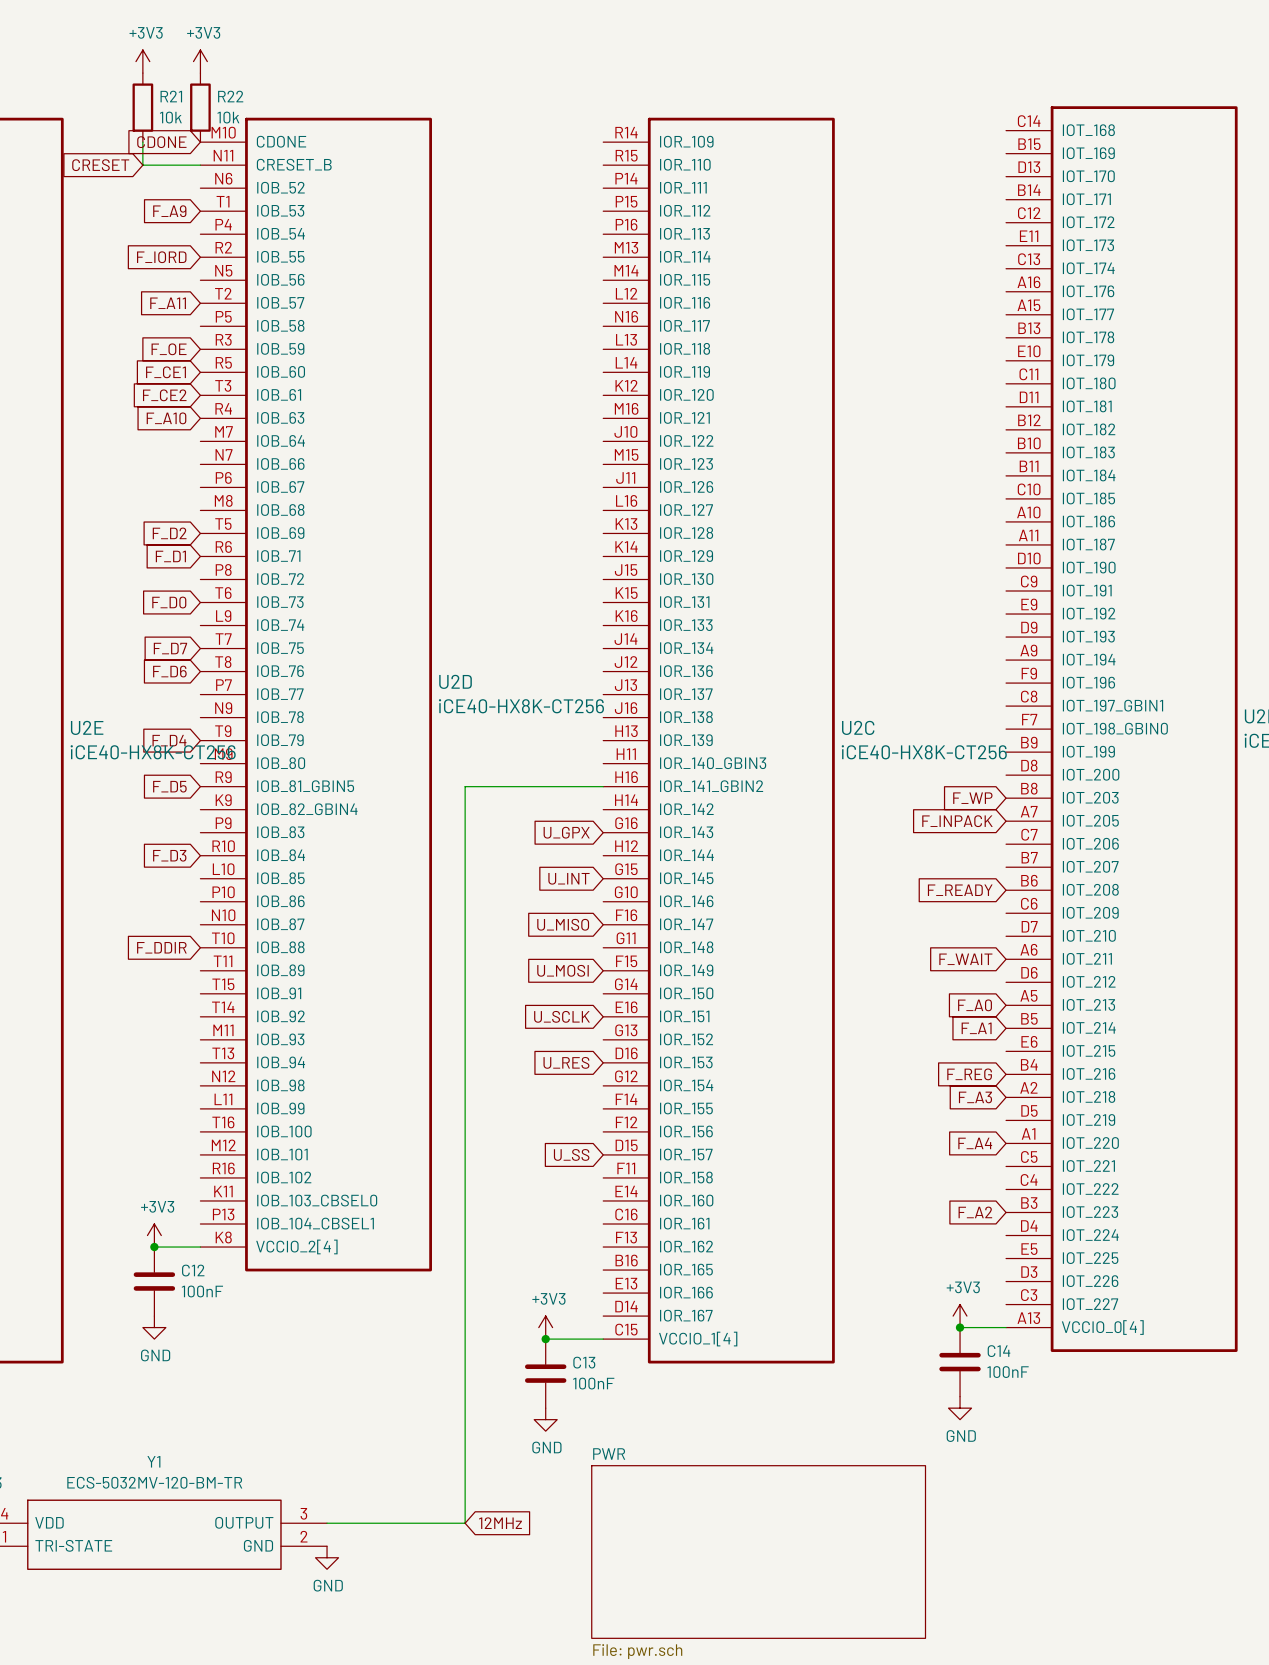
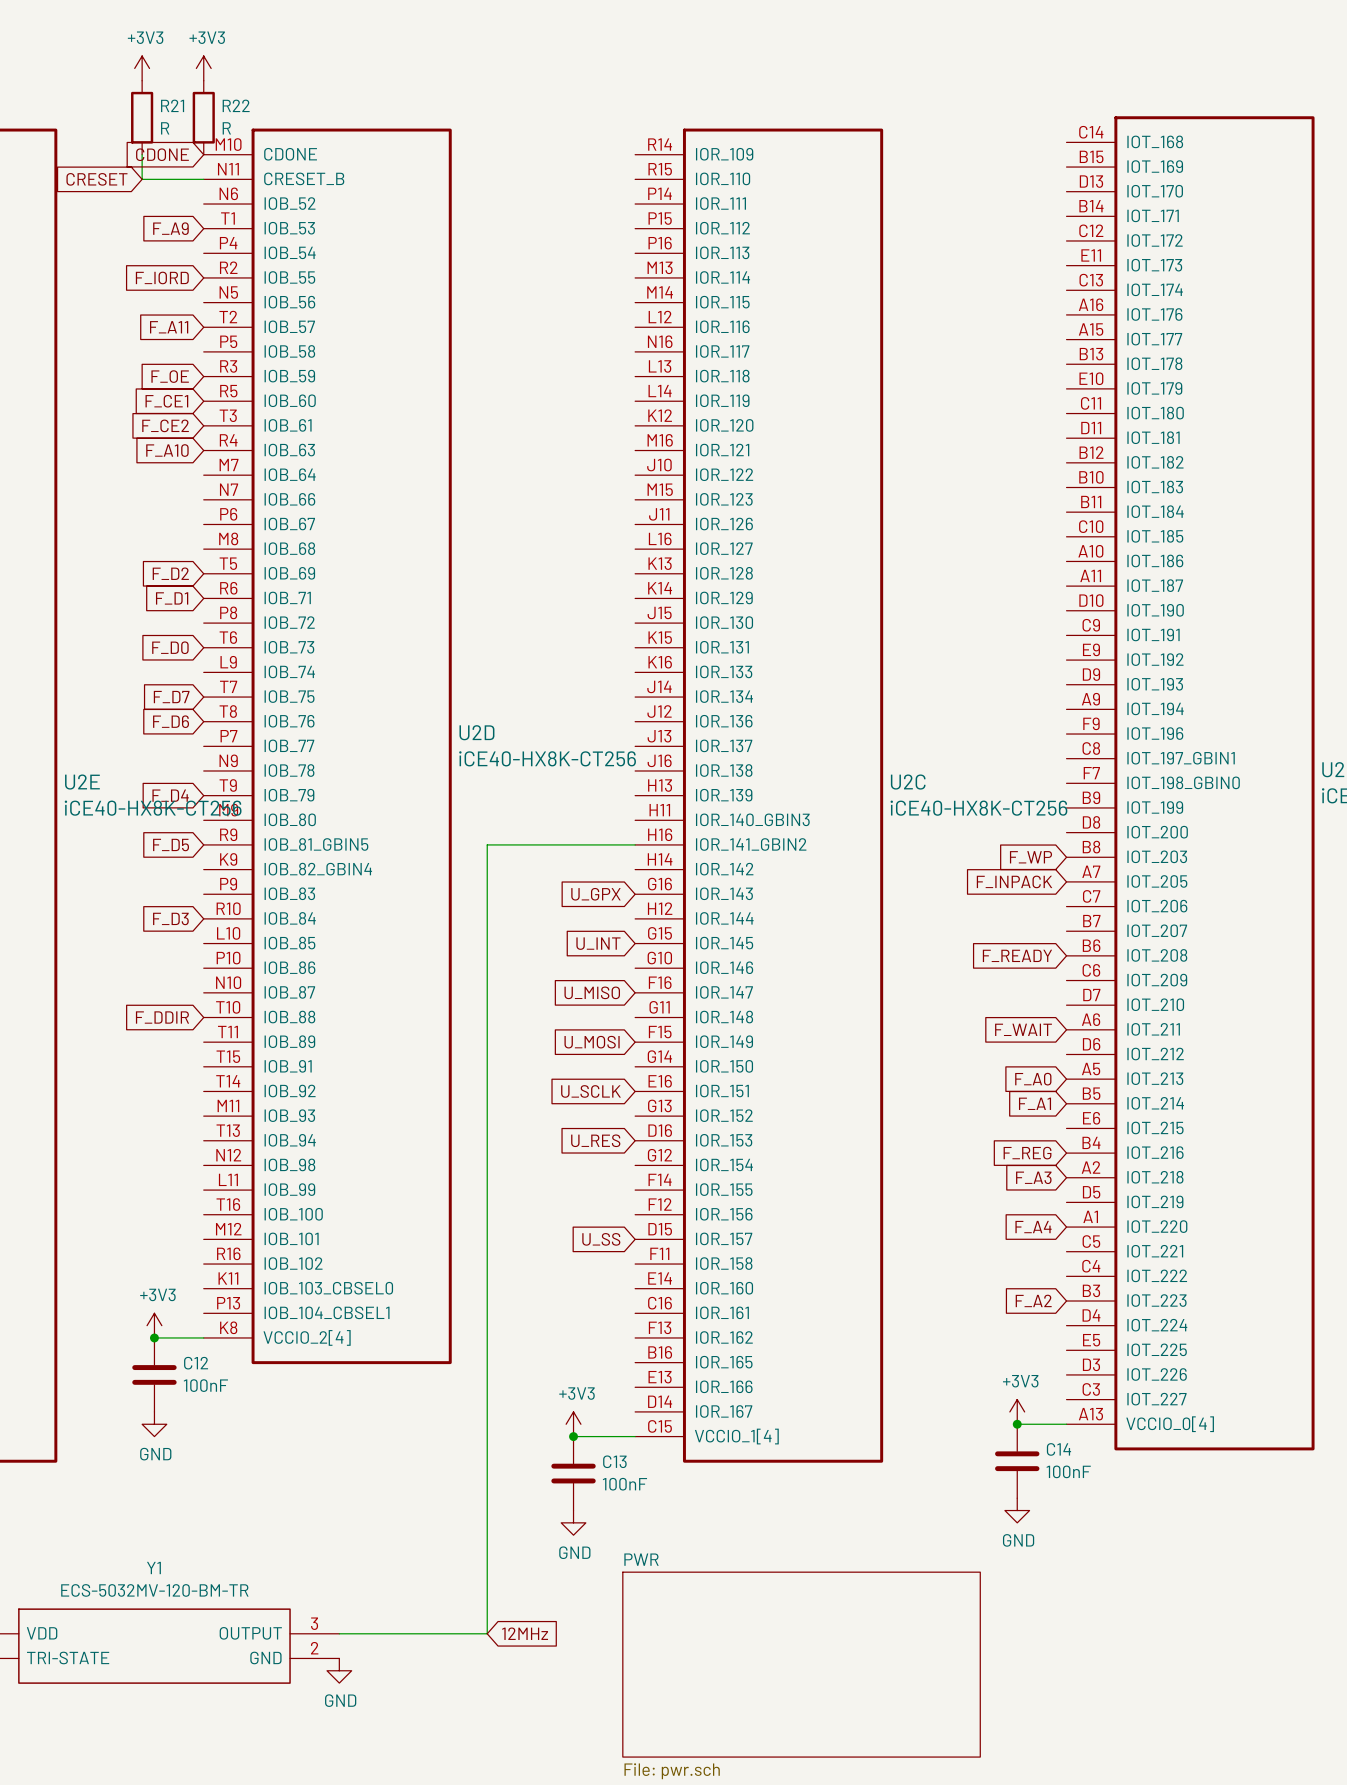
R21 value: 10k (170, 117) -> R (165, 128)
R22 value: 10k (228, 117) -> R (226, 128)

